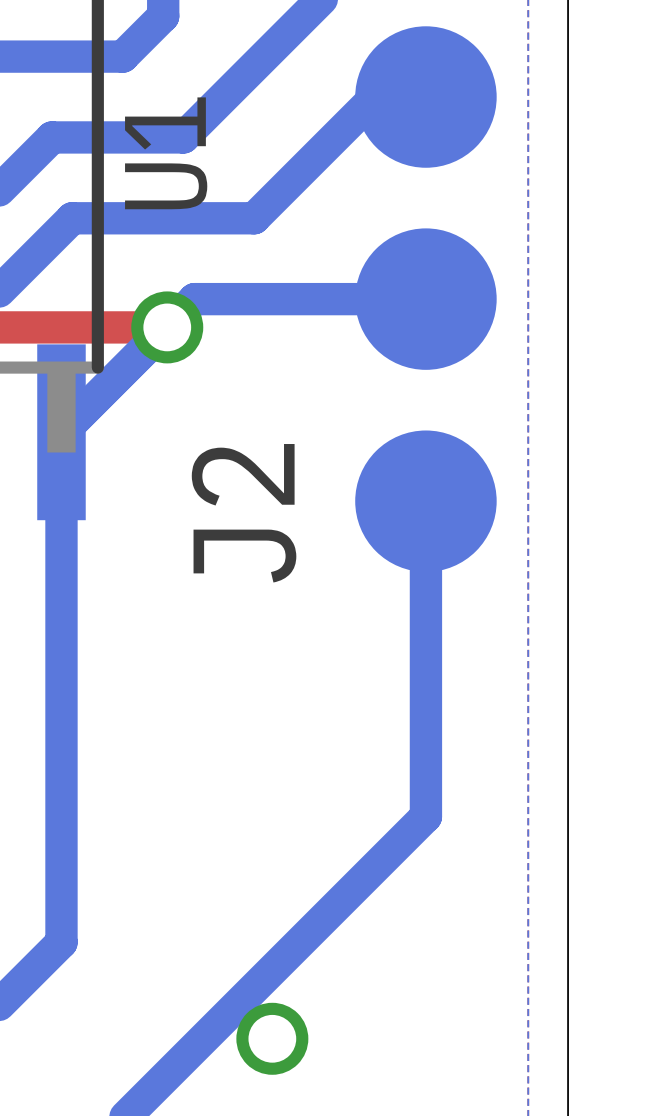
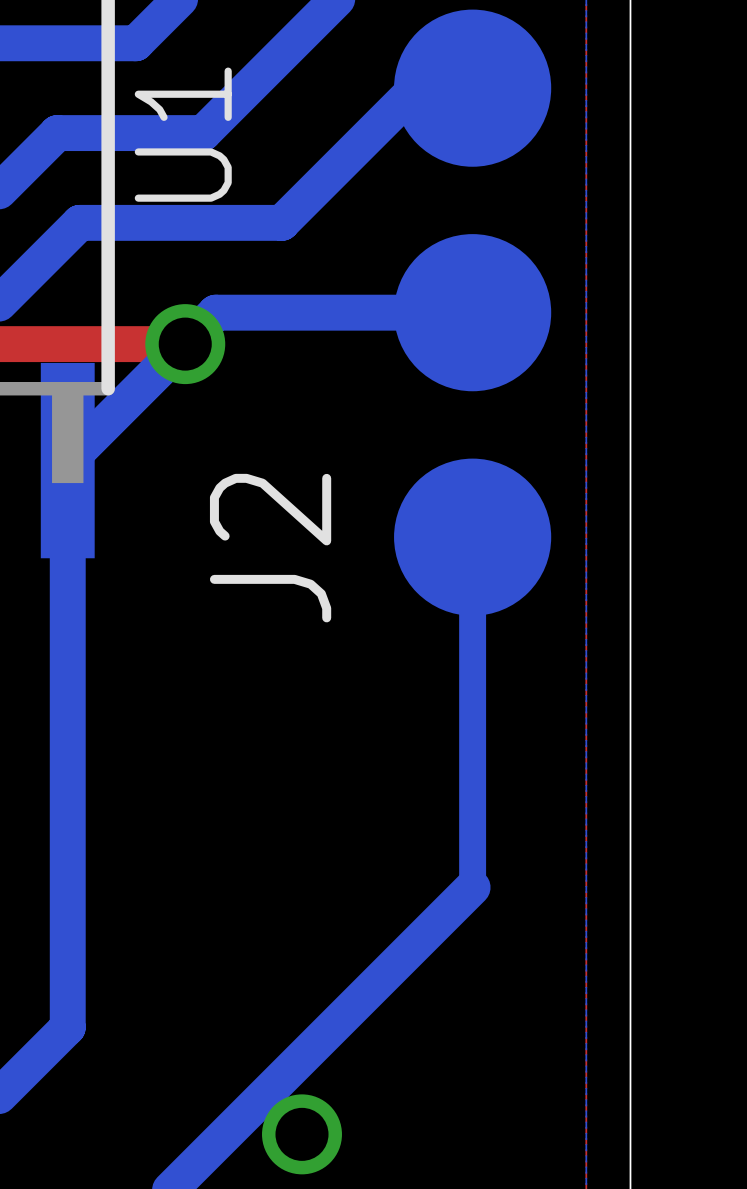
bottom track width: thick (425, 501) (425, 816) -> thin (472, 537) (472, 887)

